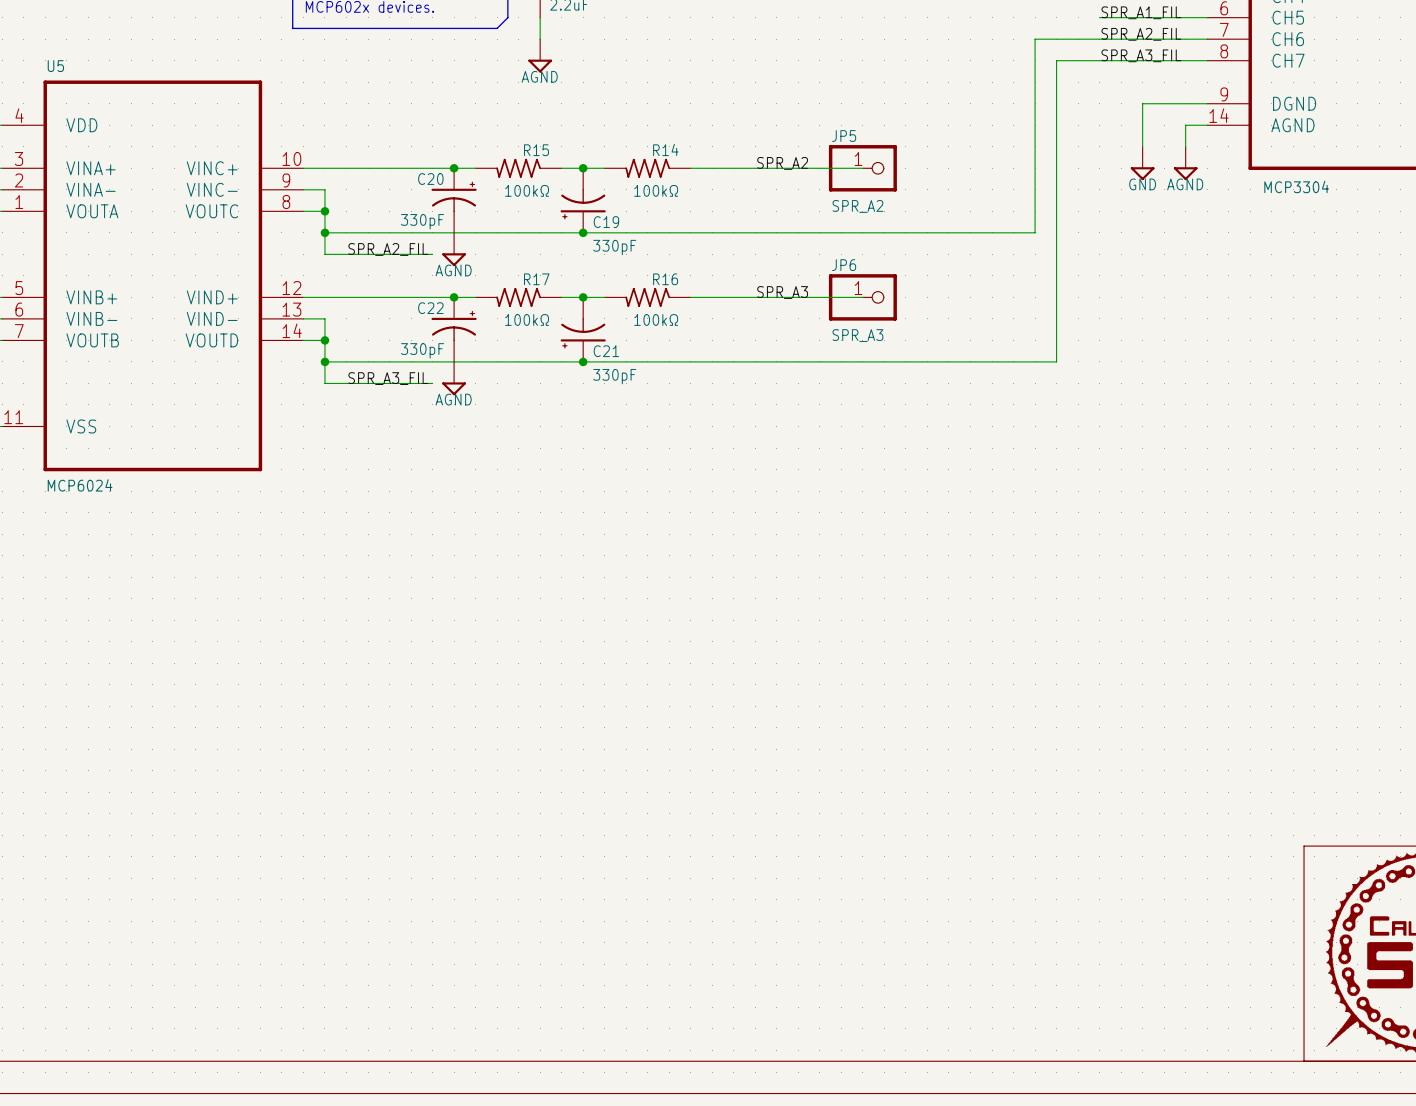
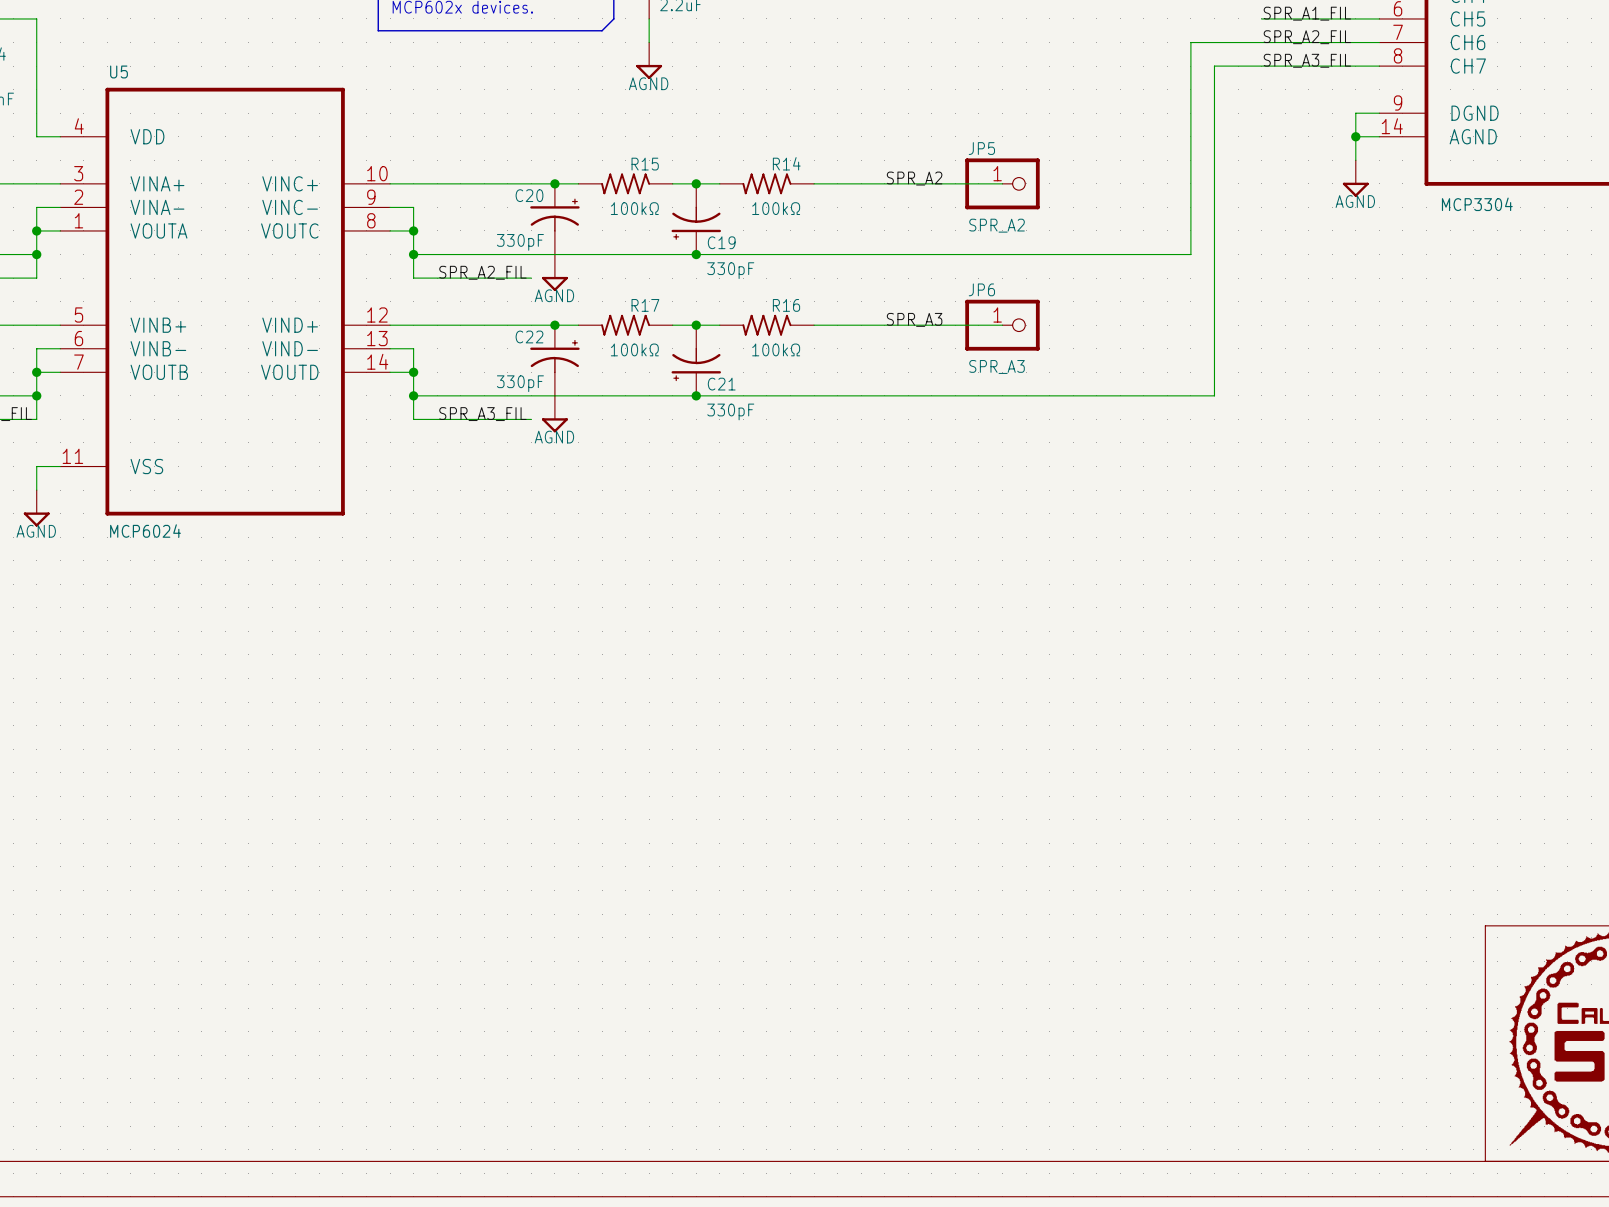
wire: (1185, 103) (1142, 103) (1142, 146) -> (1355, 113) (1355, 136)
junction: none -> (1355, 136)
power symbol: GND (1142, 163) -> none

